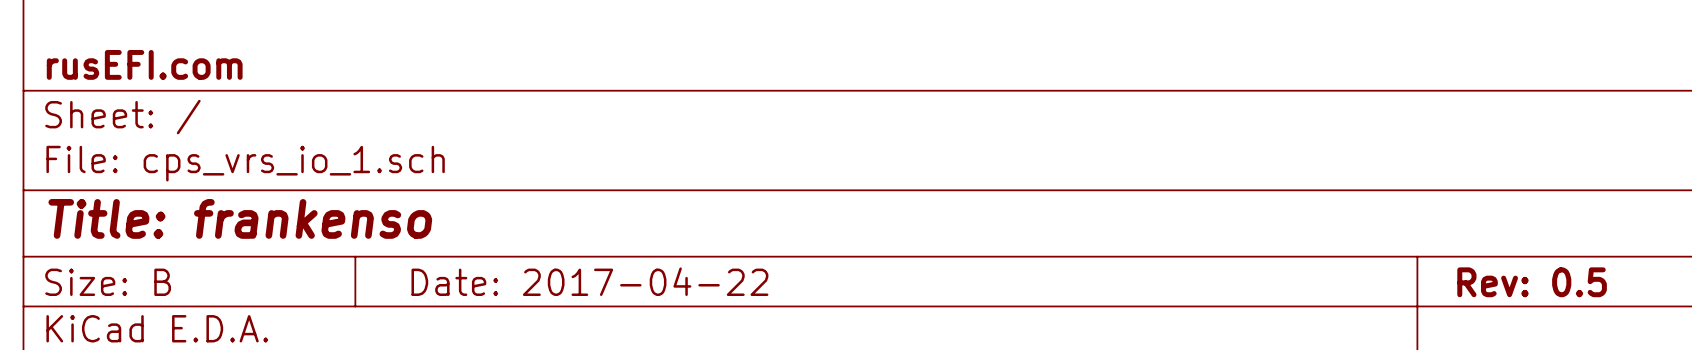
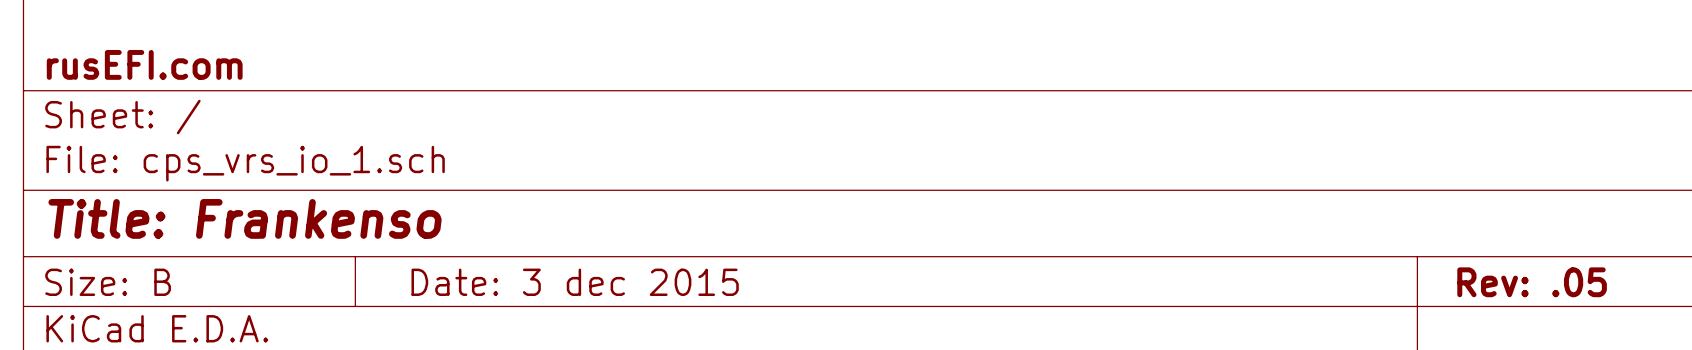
title block: Title: frankenso (240, 218) -> Title: Frankenso (245, 218)
title block: Date: 2017-04-22 (589, 281) -> Date: 3 dec 2015 (575, 282)
title block: Rev: 0.5 (1532, 282) -> Rev: .05 (1532, 282)

